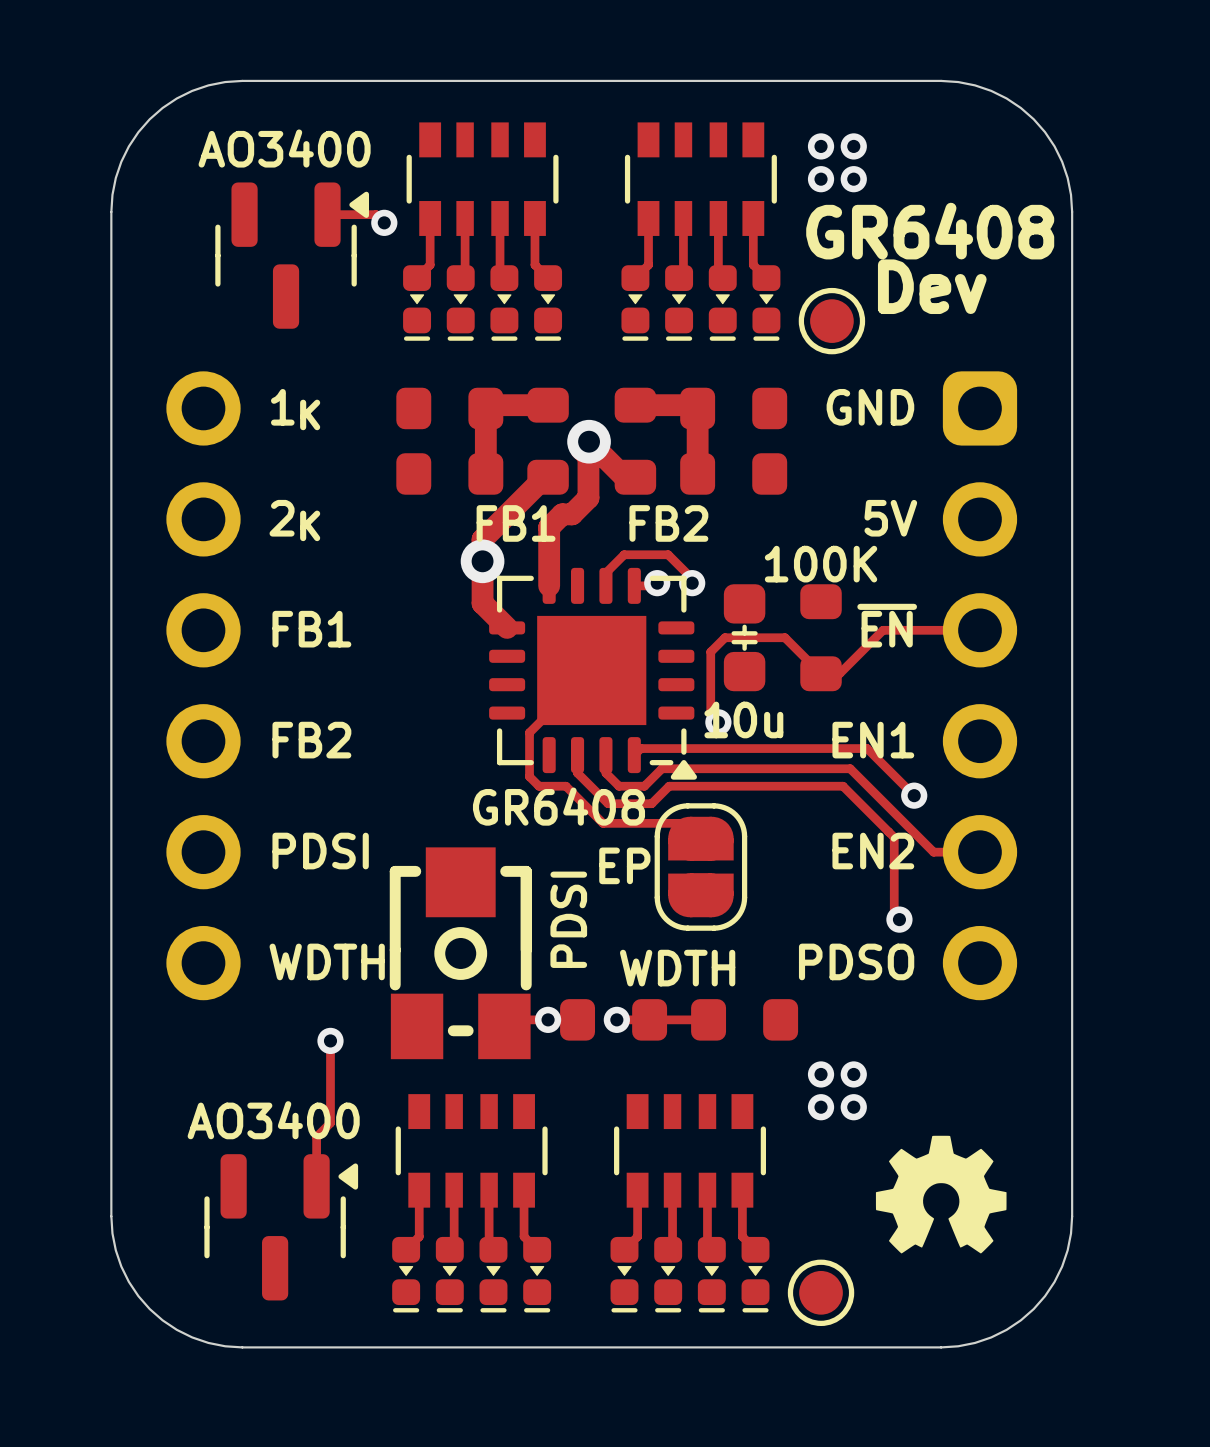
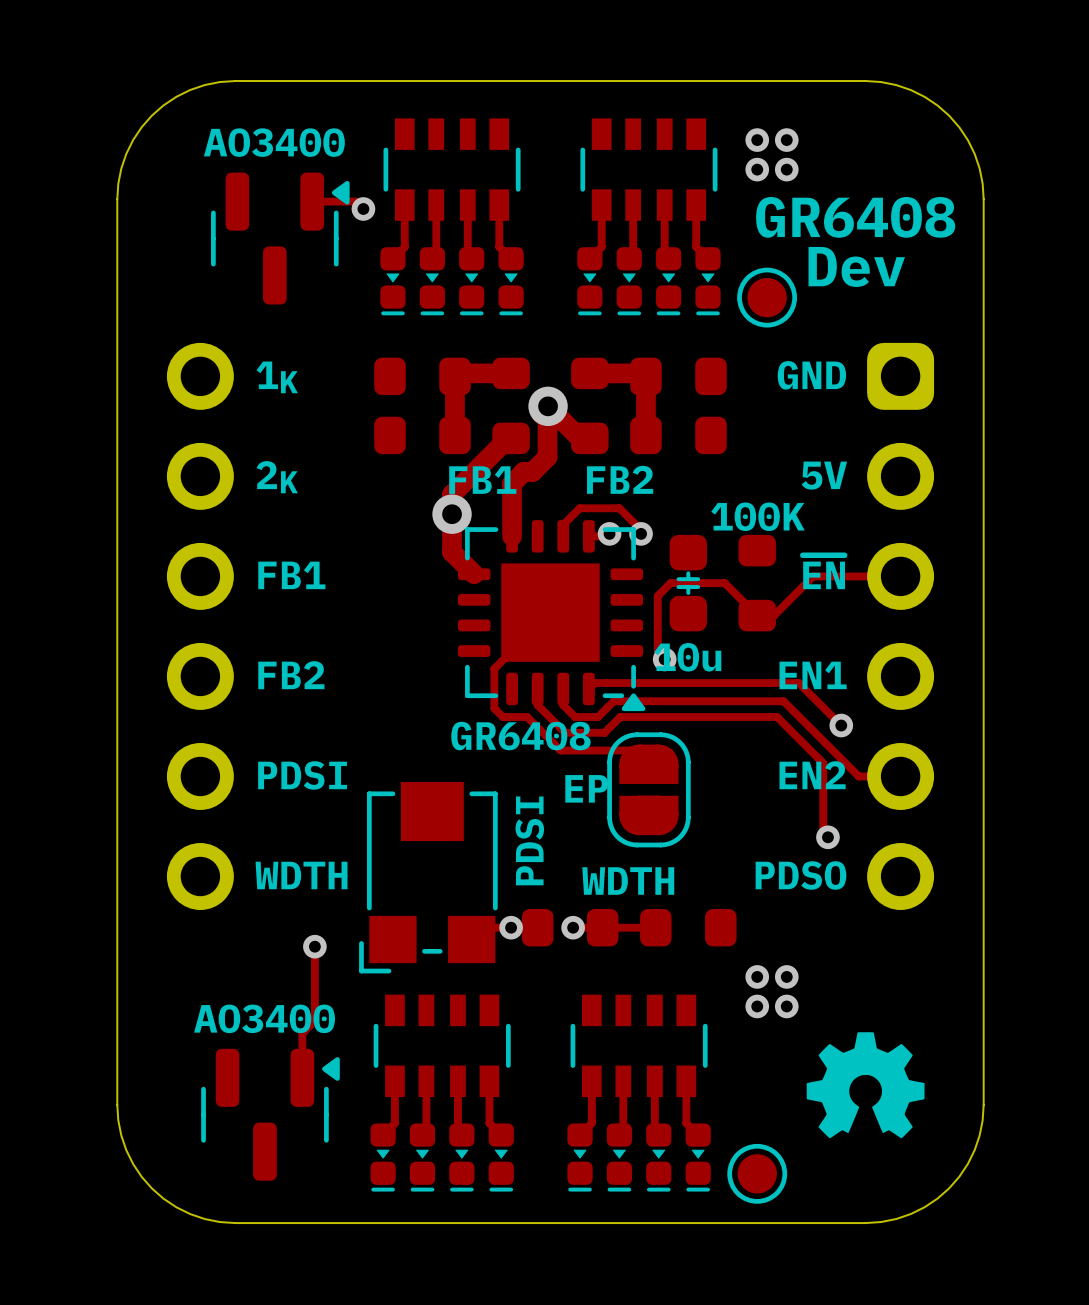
part footprint: [389, 847, 532, 1060] -> [359, 781, 498, 974]

